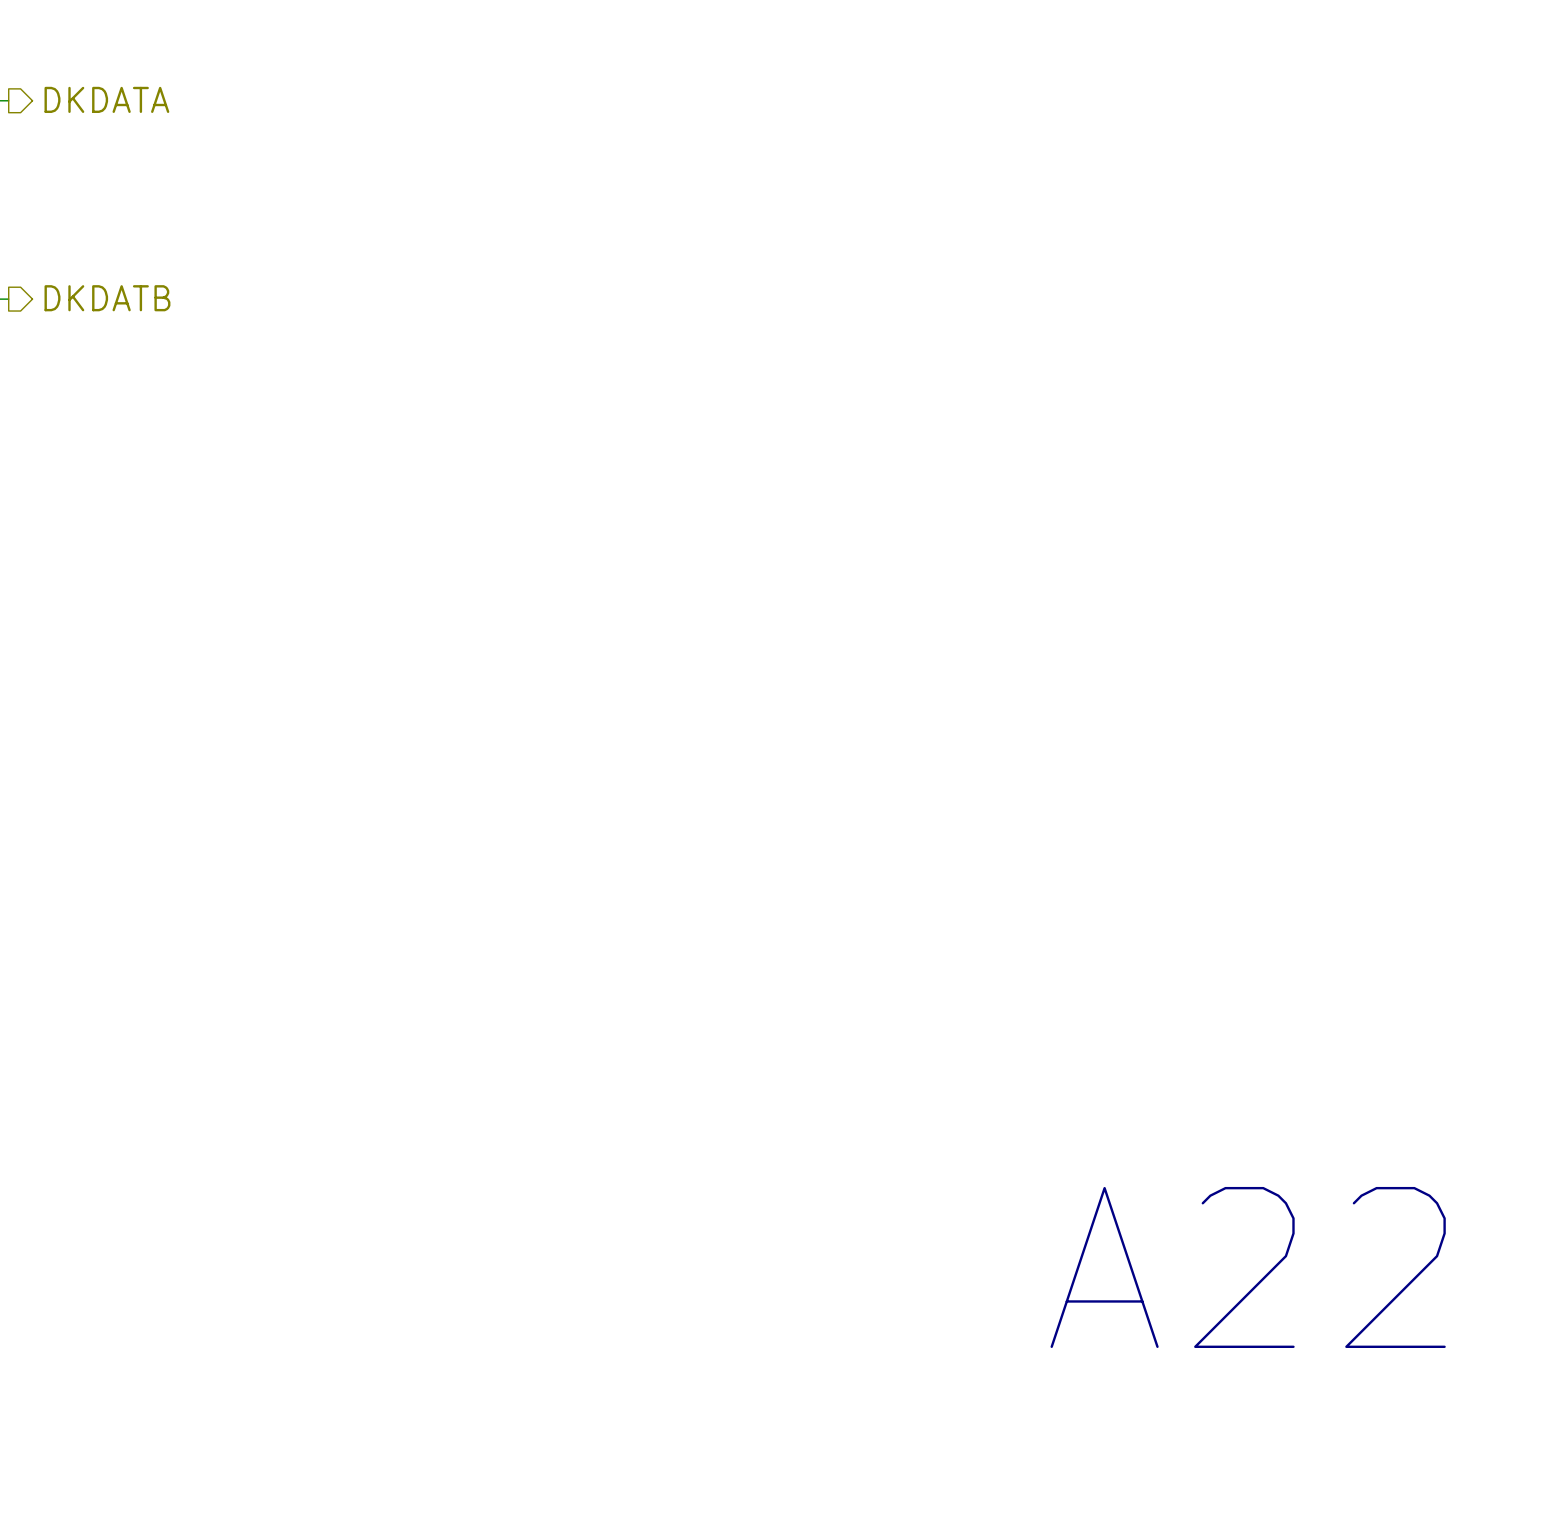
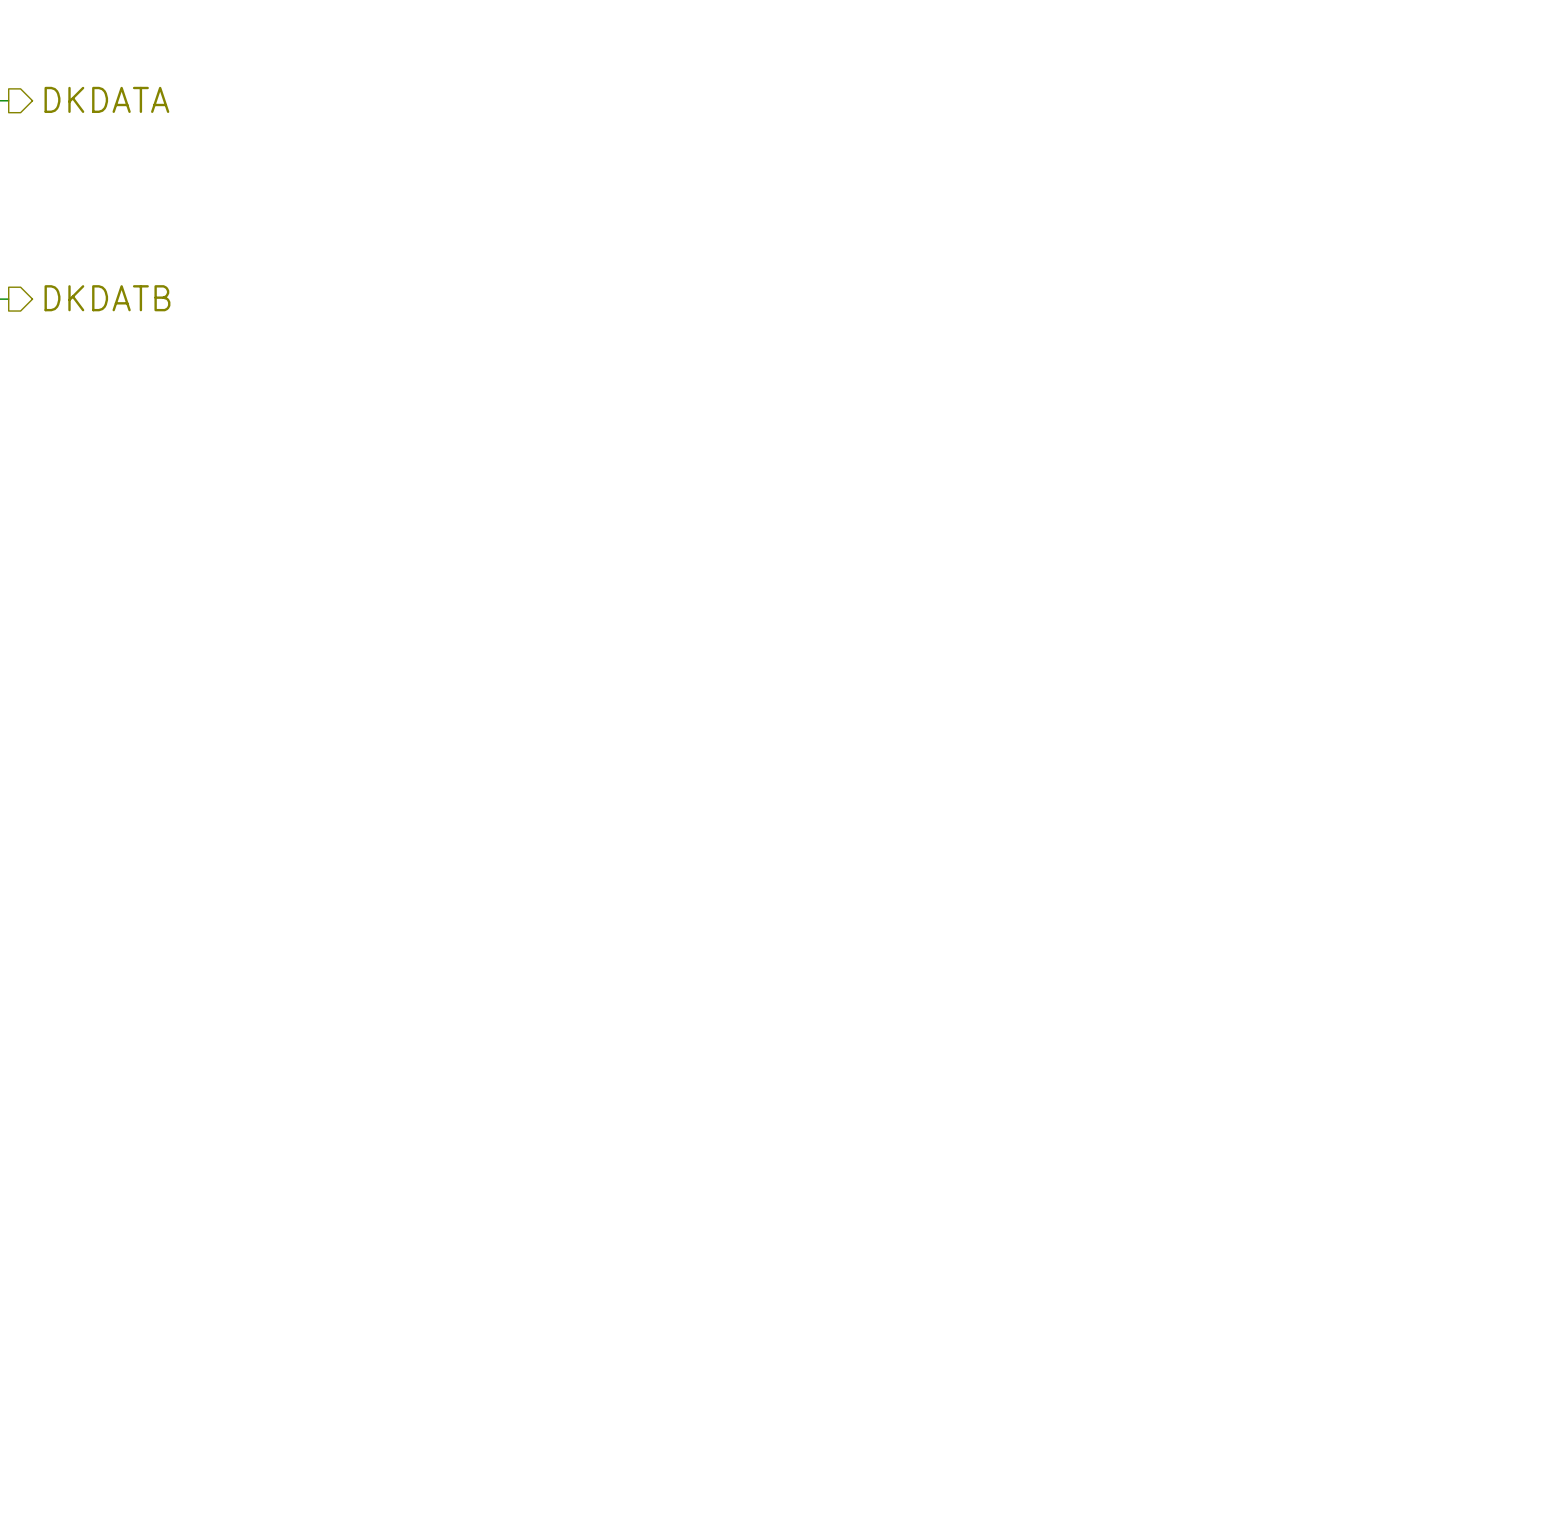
text: A22 (1248, 1267) -> none

